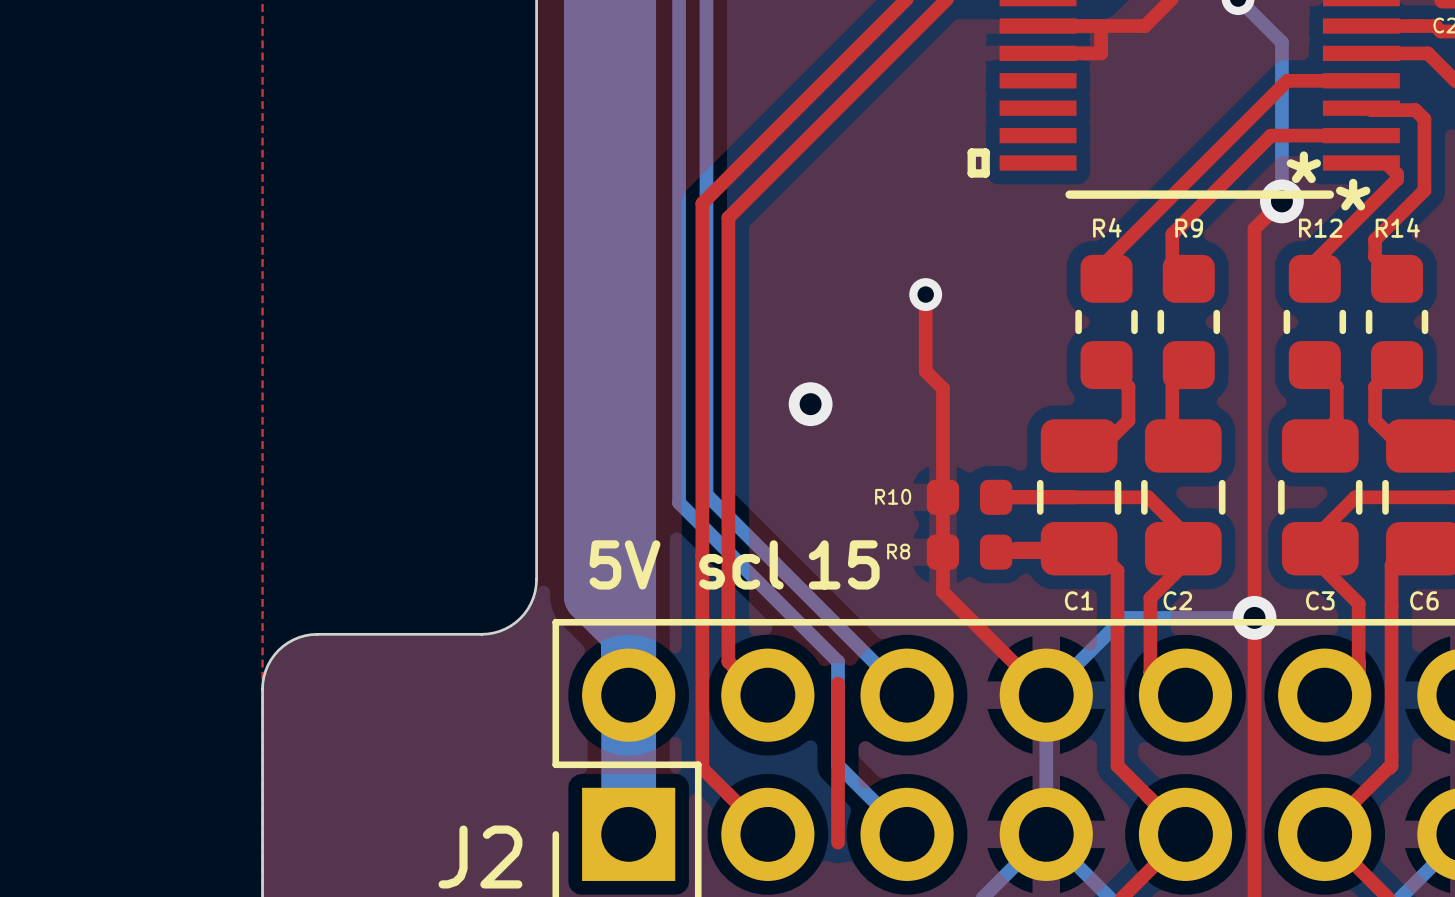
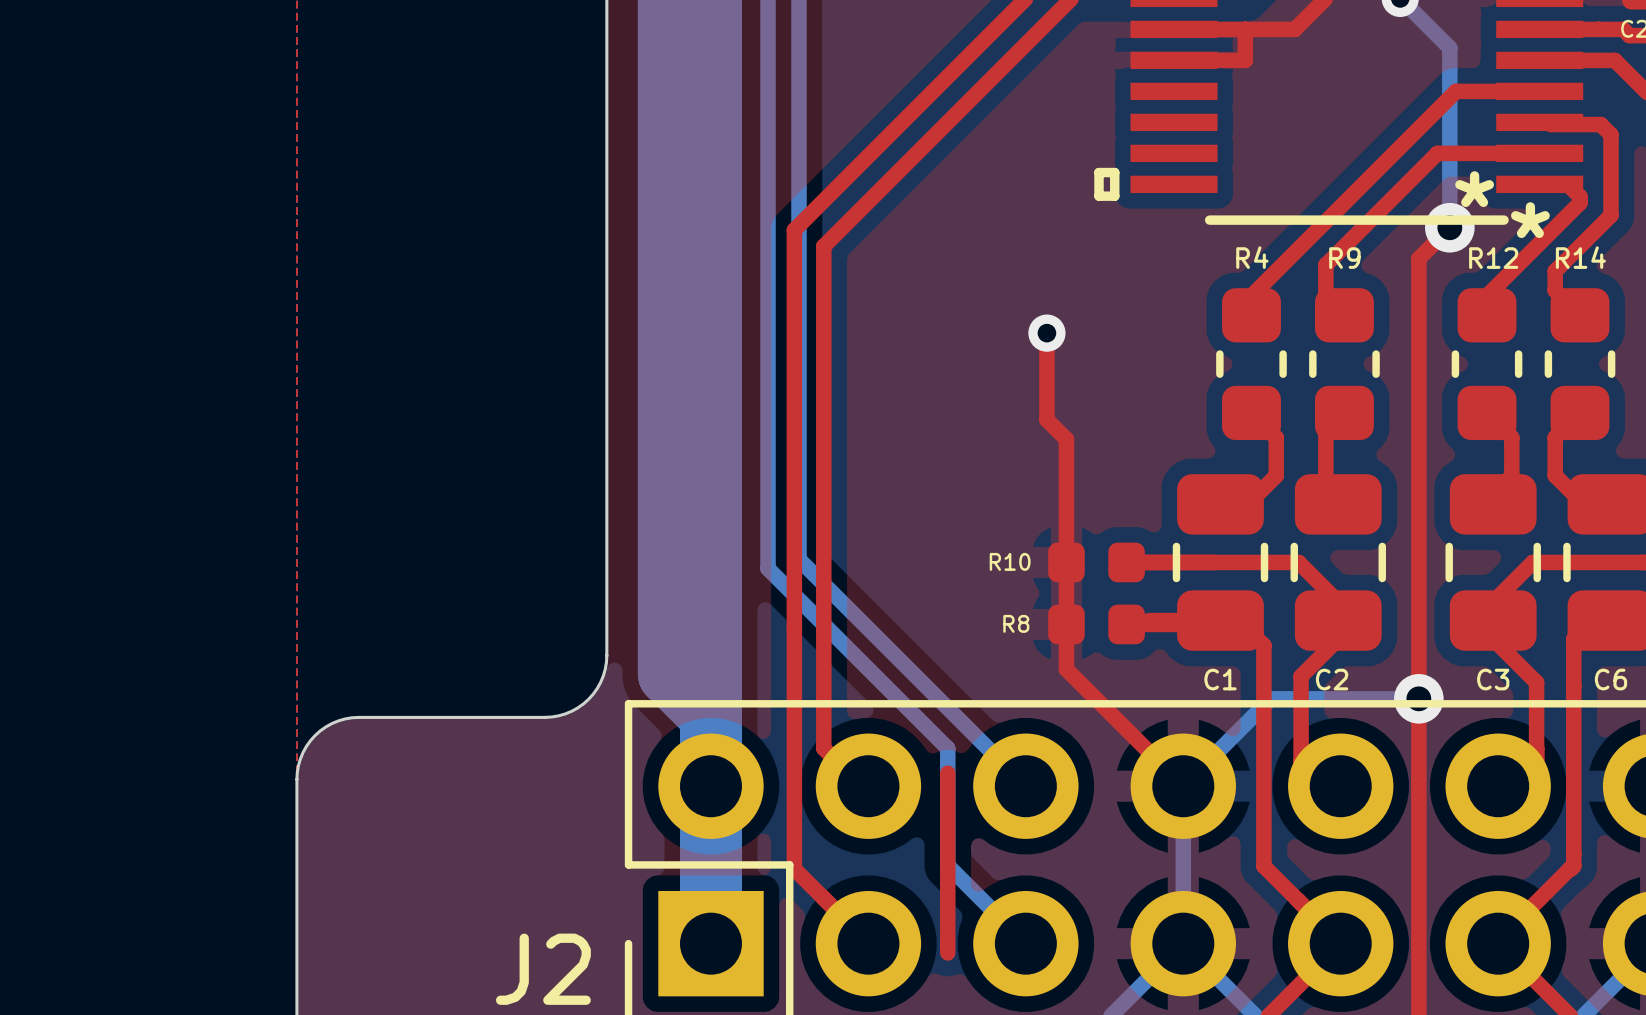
via: (810, 404) -> none
text: 5V (624, 564) -> none
text: scl (741, 564) -> none
text: 15 (844, 564) -> none

